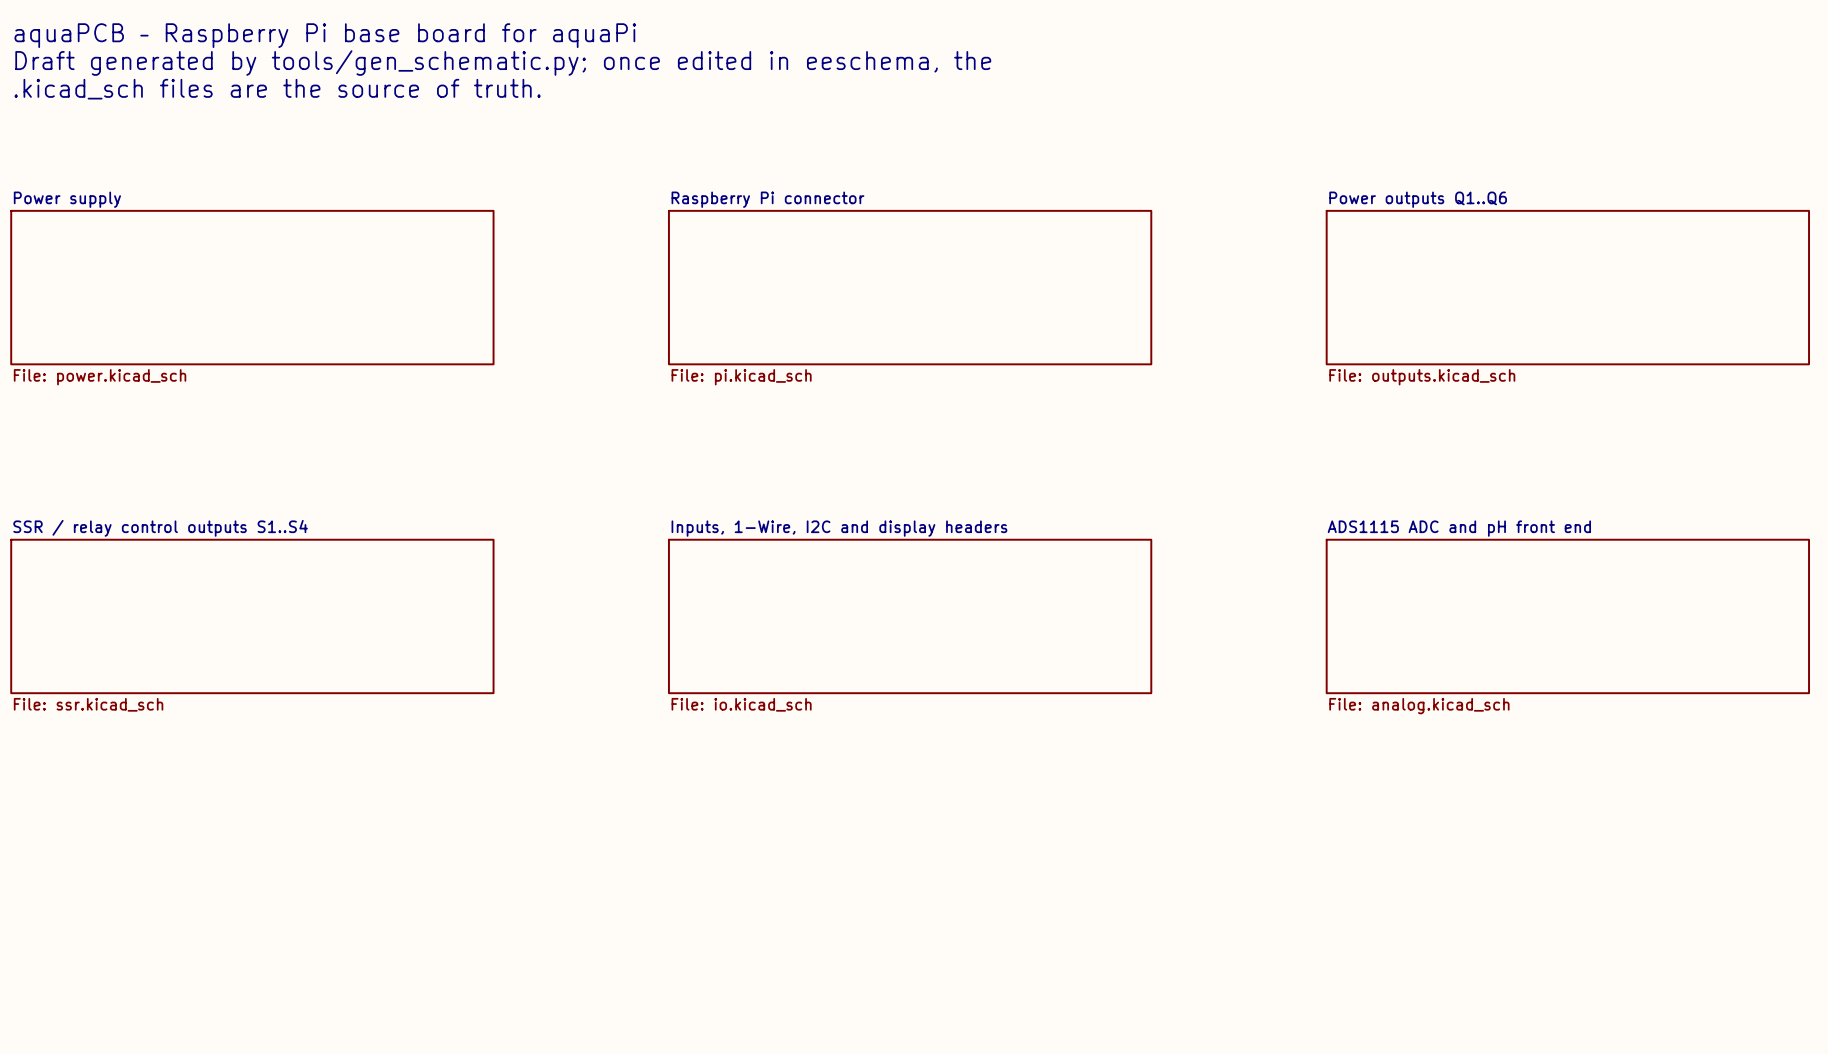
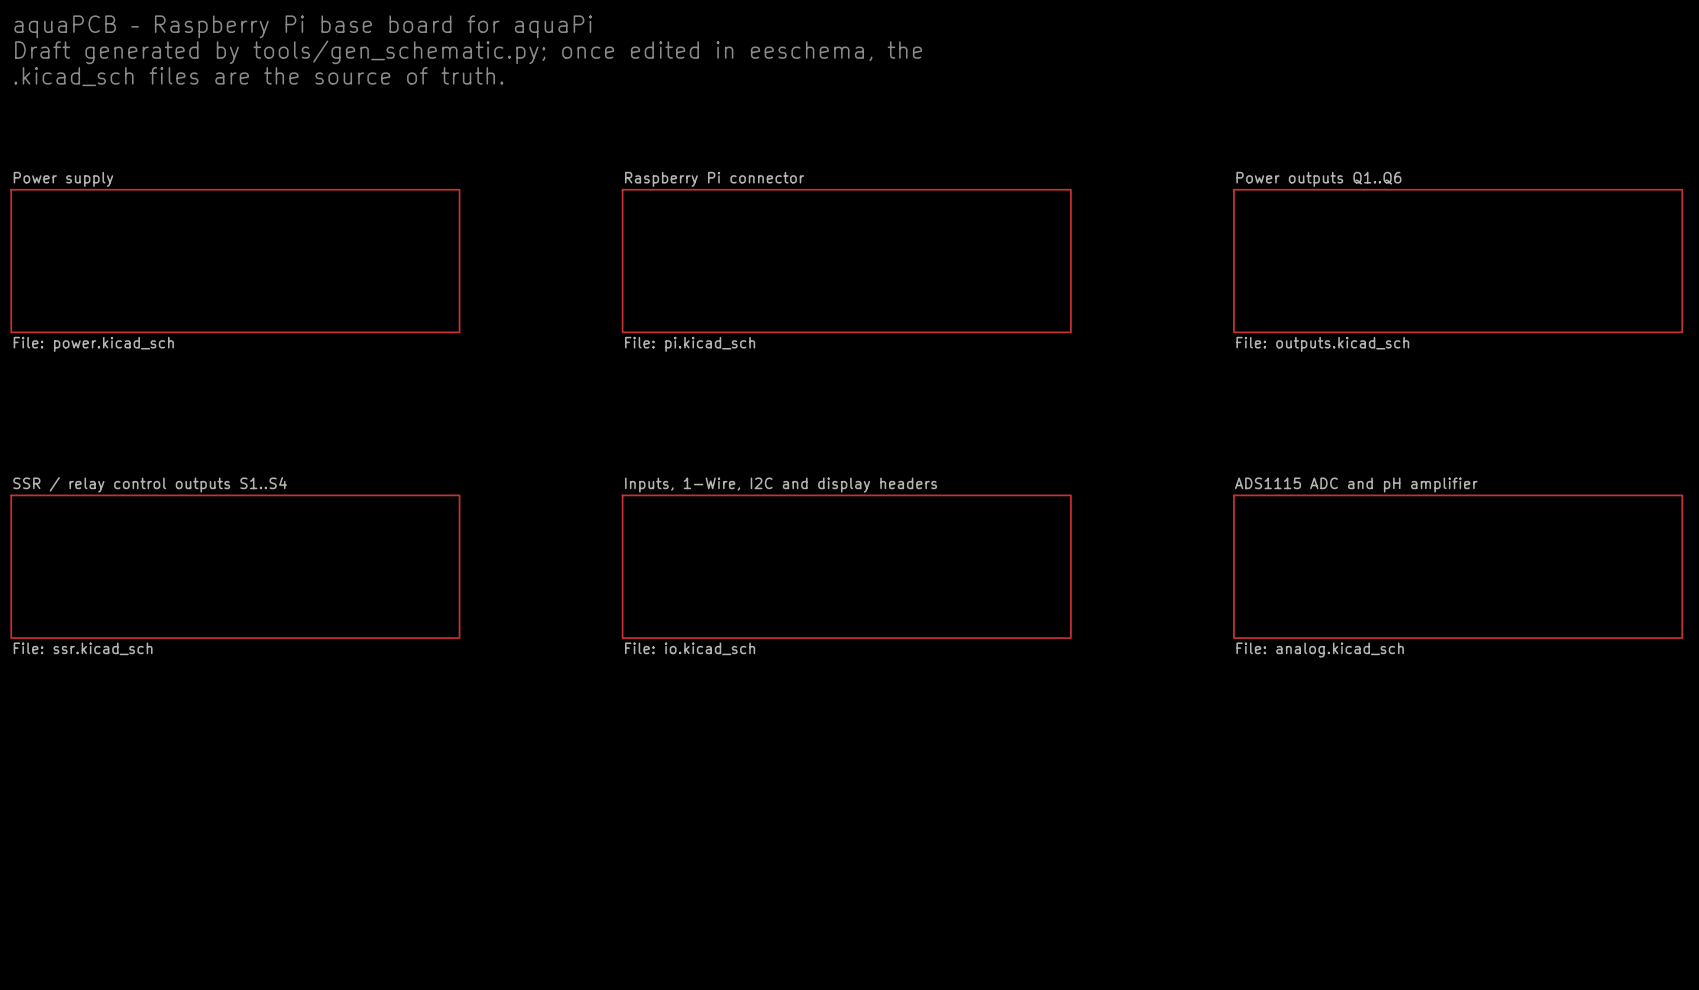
sheet ADS1115 ADC and pH front end name: ADS1115 ADC and pH front end (1459, 528) -> ADS1115 ADC and pH amplifier (1356, 485)

